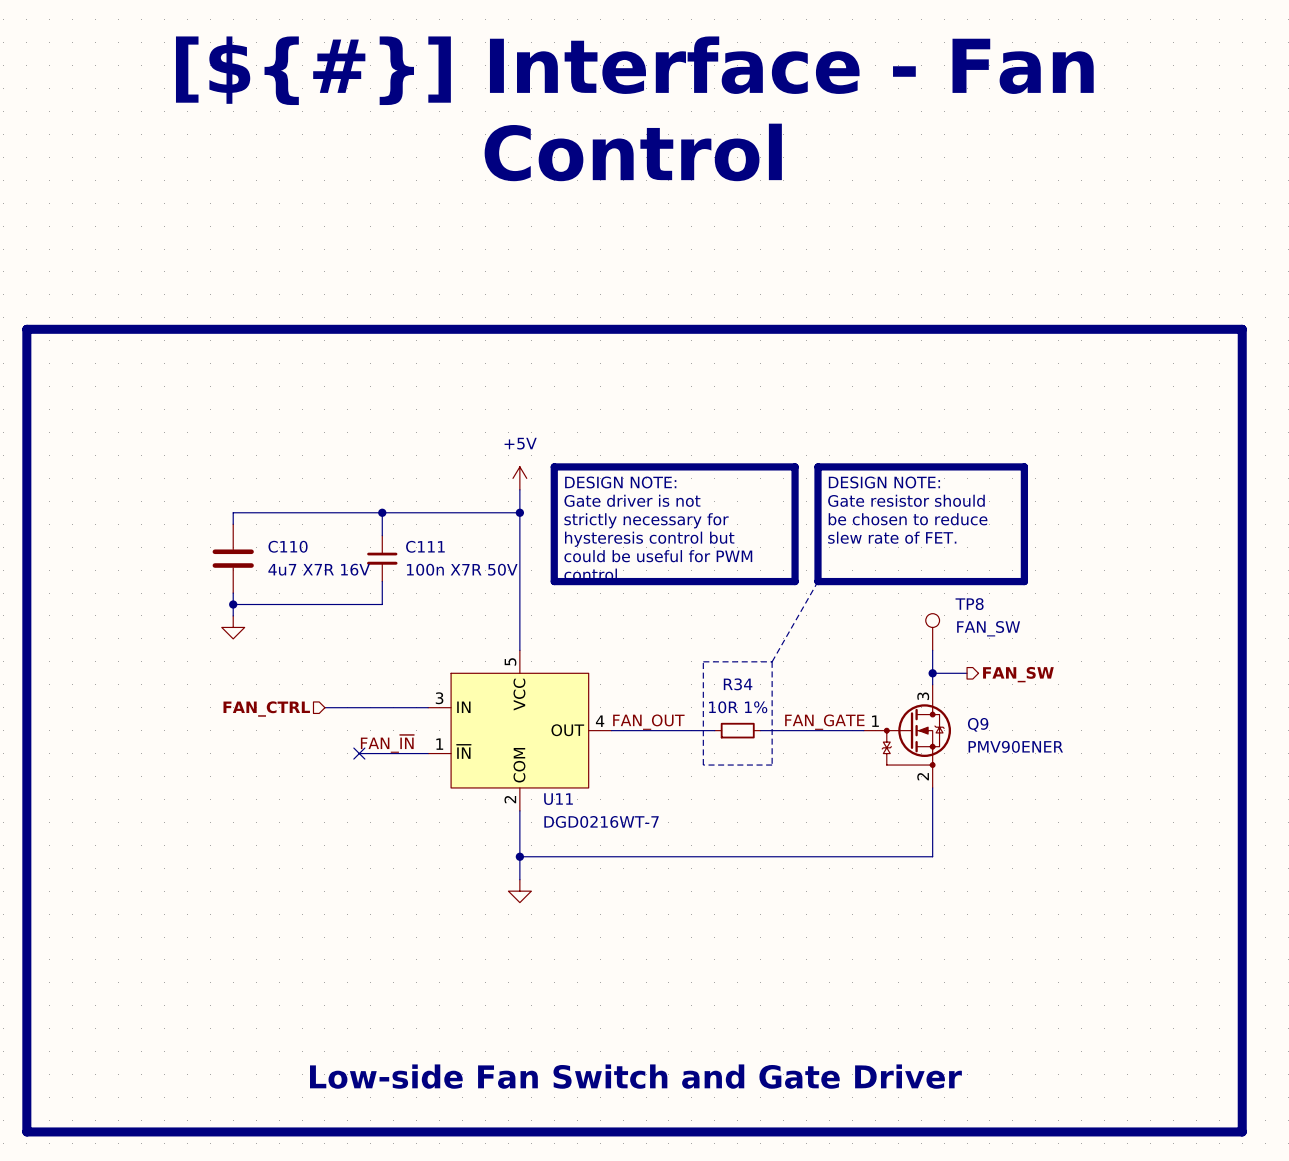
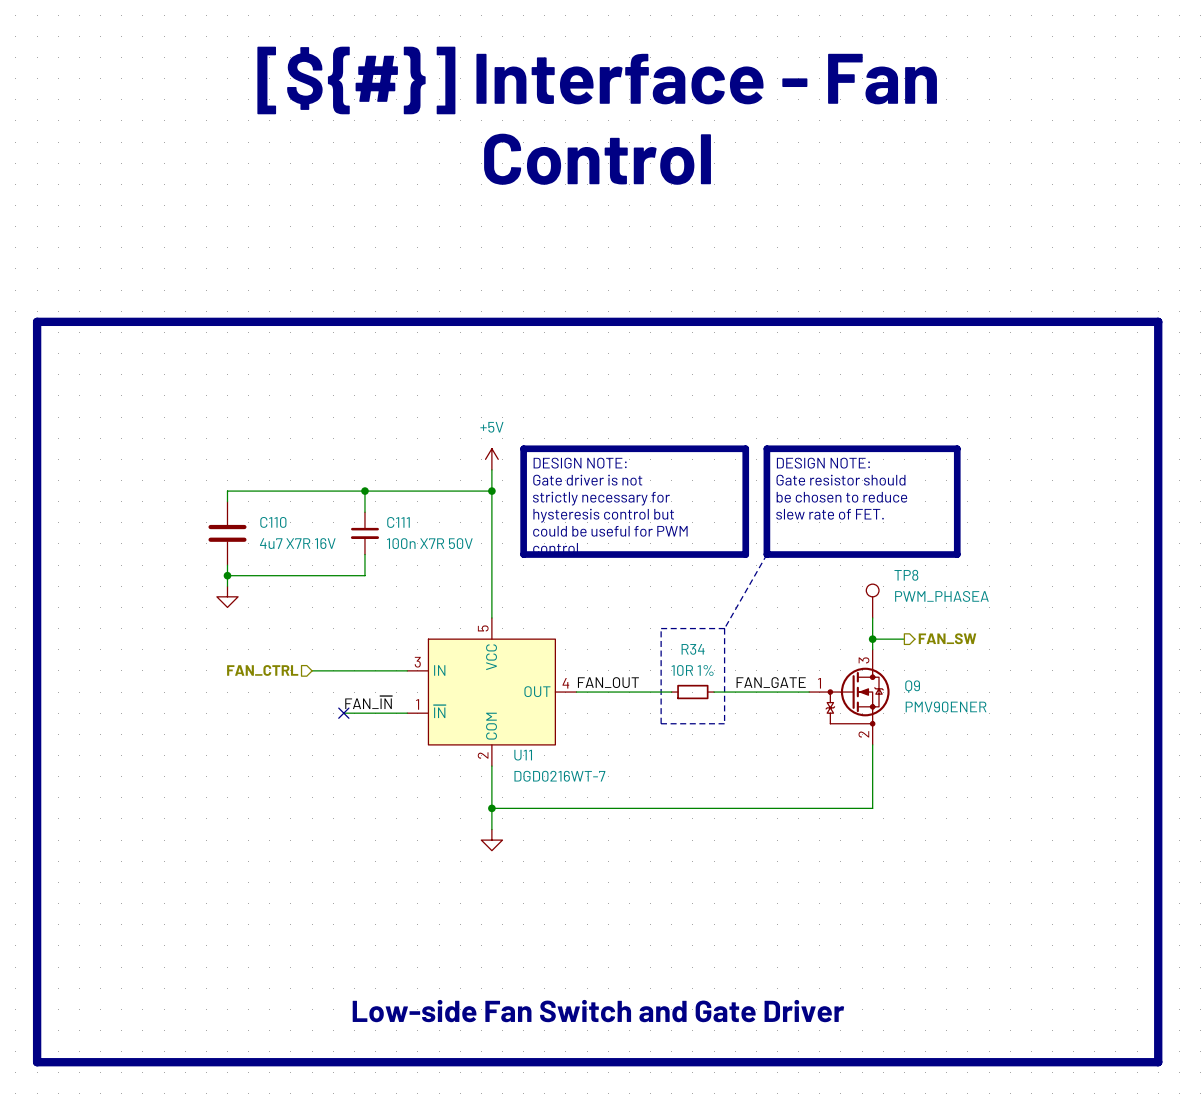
TP8 value: FAN_SW (988, 628) -> PWM_PHASEA (941, 596)

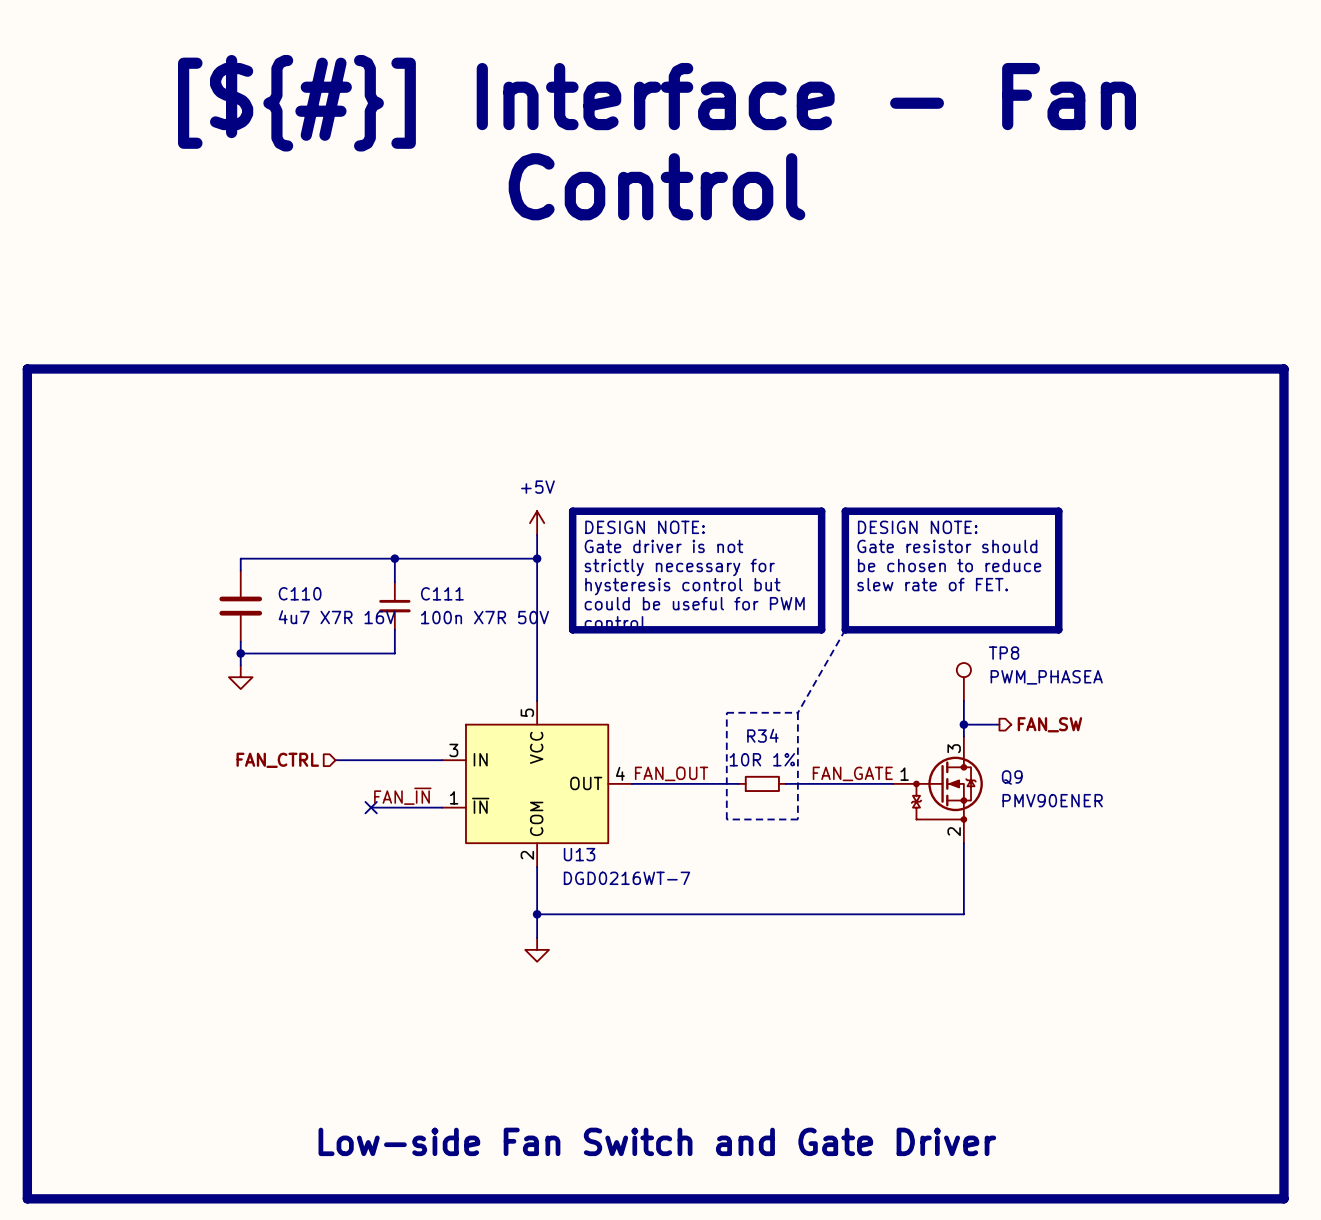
U11 name: U11 (523, 755) -> U13 (579, 854)

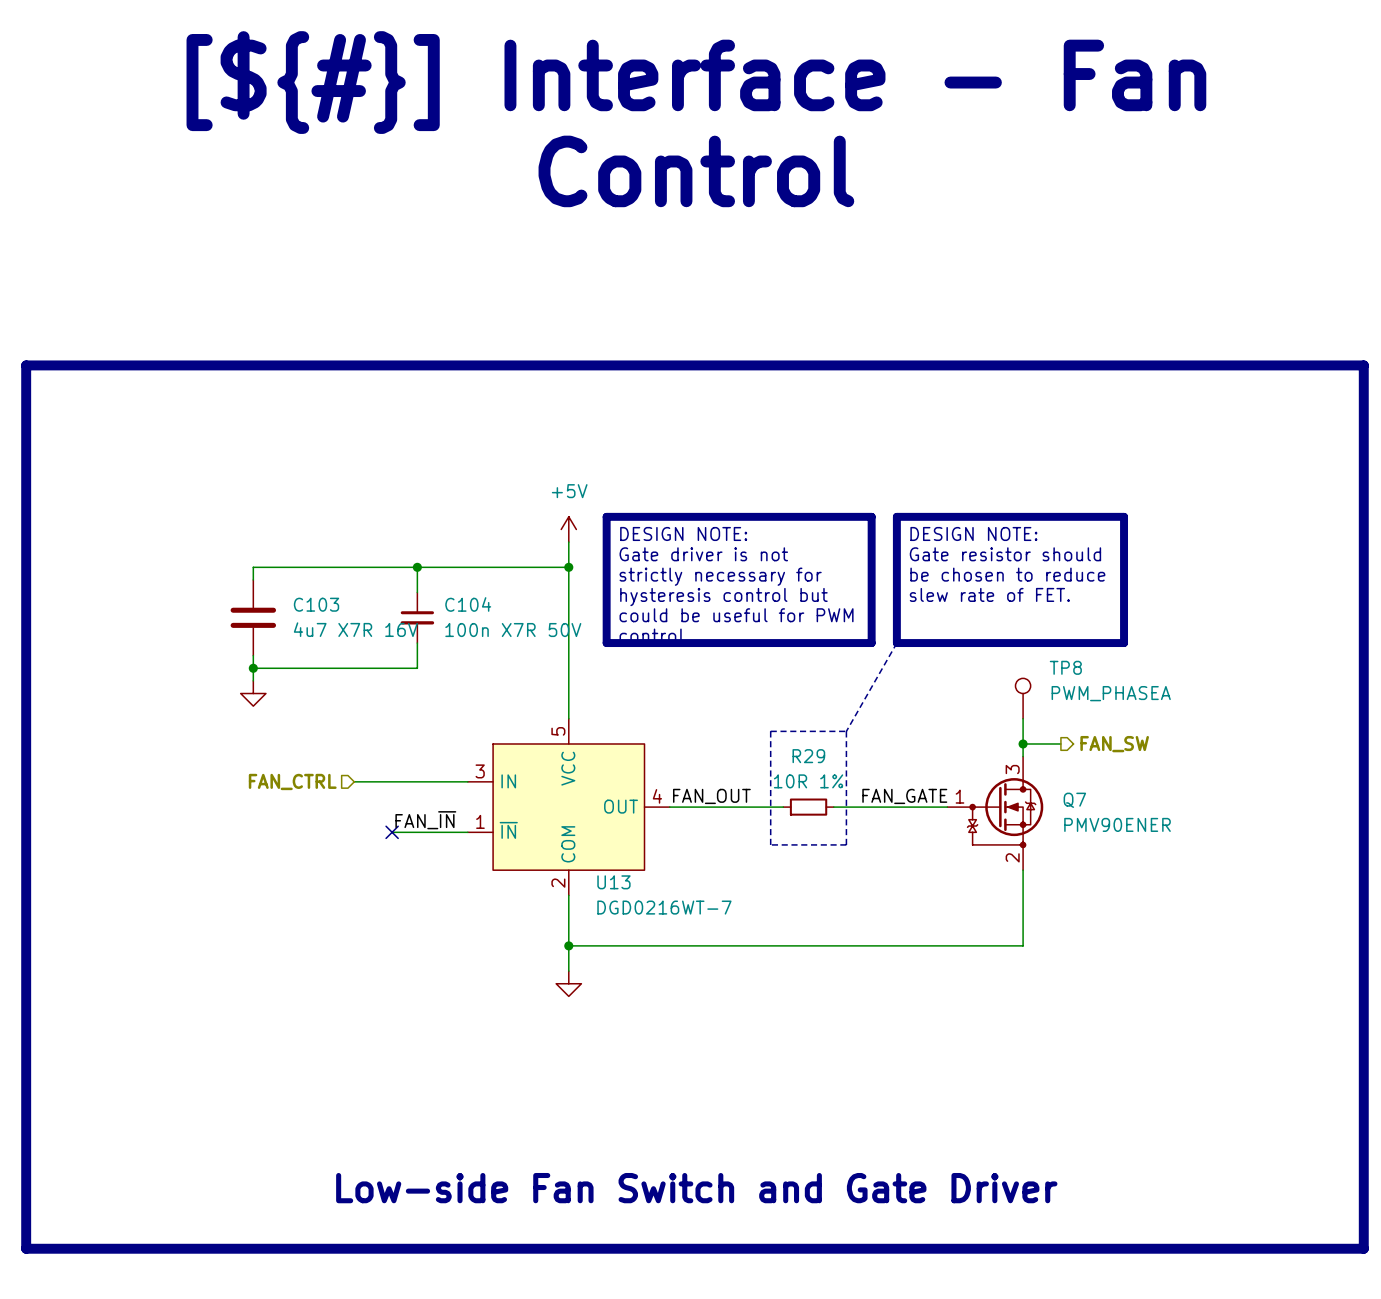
C110 name: C110 (300, 593) -> C103 (316, 604)
C111 name: C111 (442, 593) -> C104 (468, 604)
R34 name: R34 (762, 735) -> R29 (808, 756)
Q9 name: Q9 (1012, 777) -> Q7 (1074, 800)

